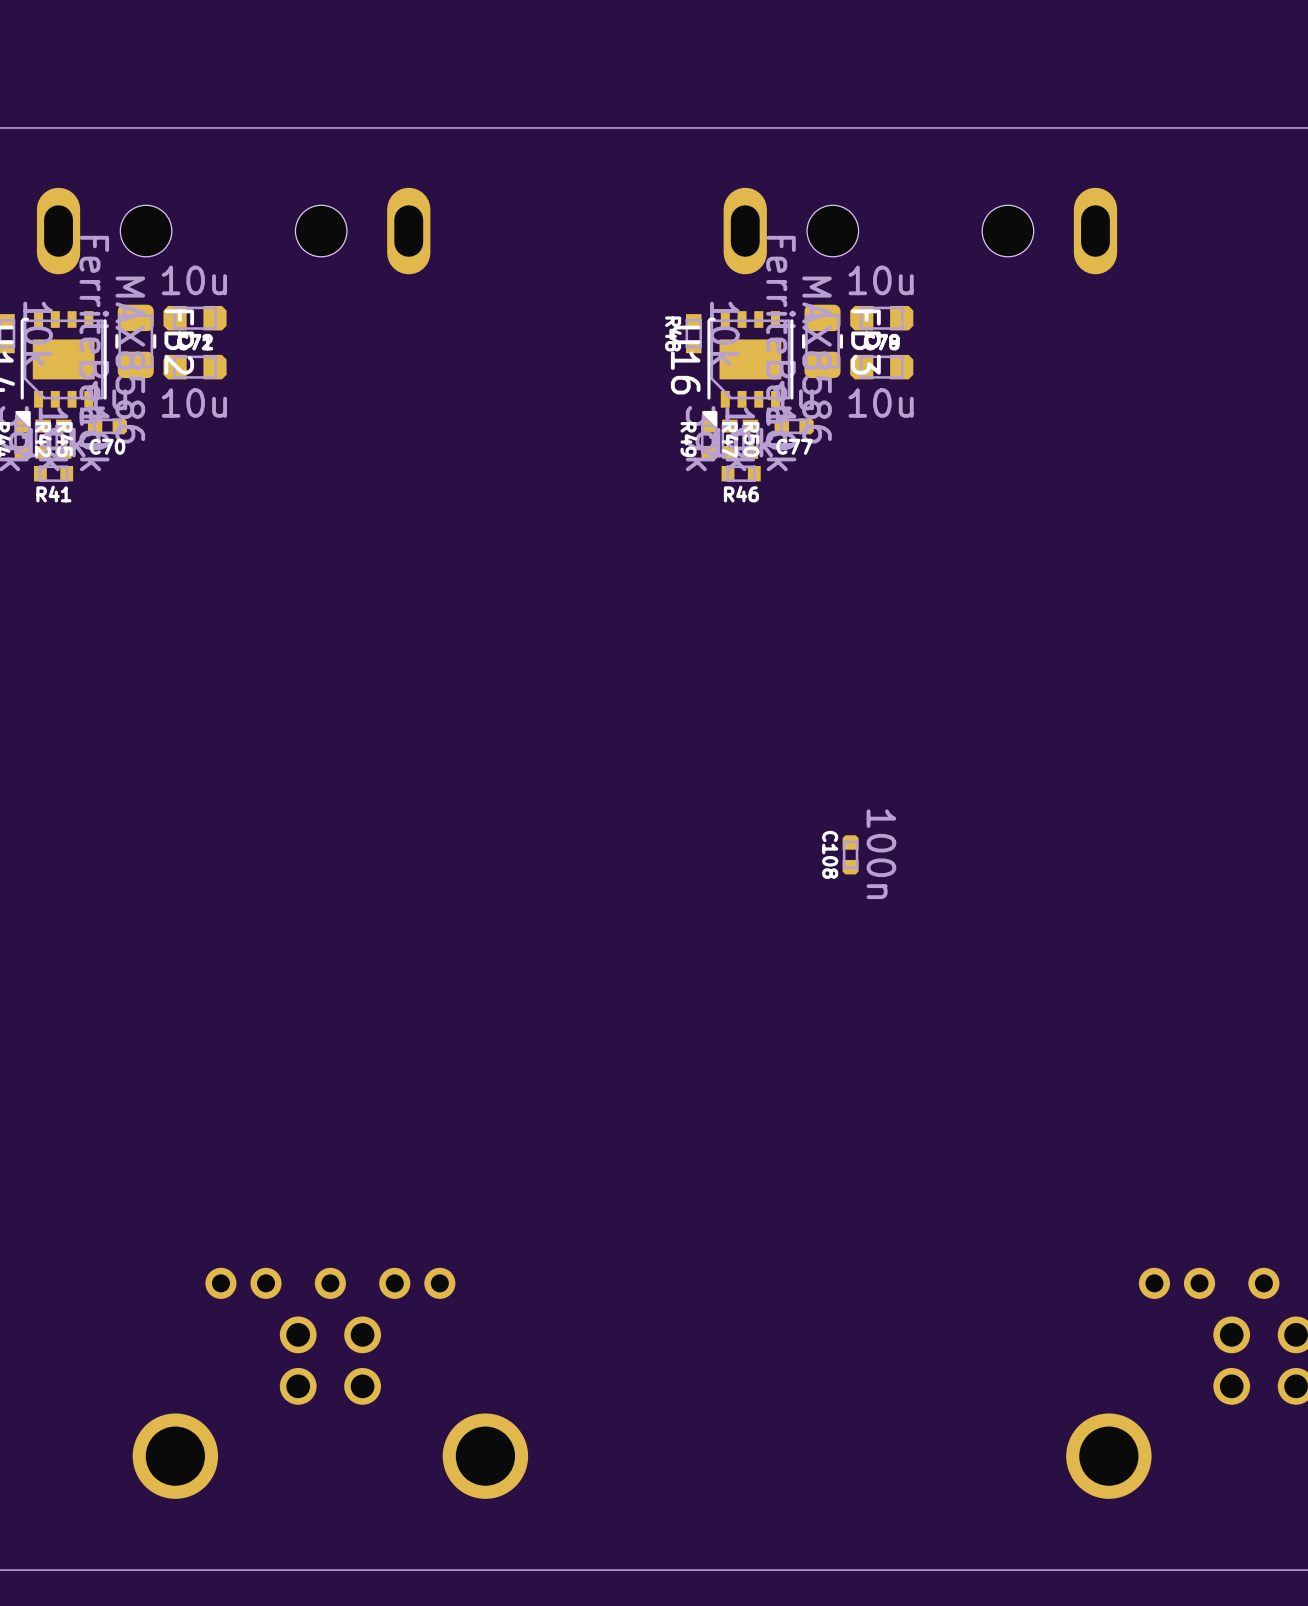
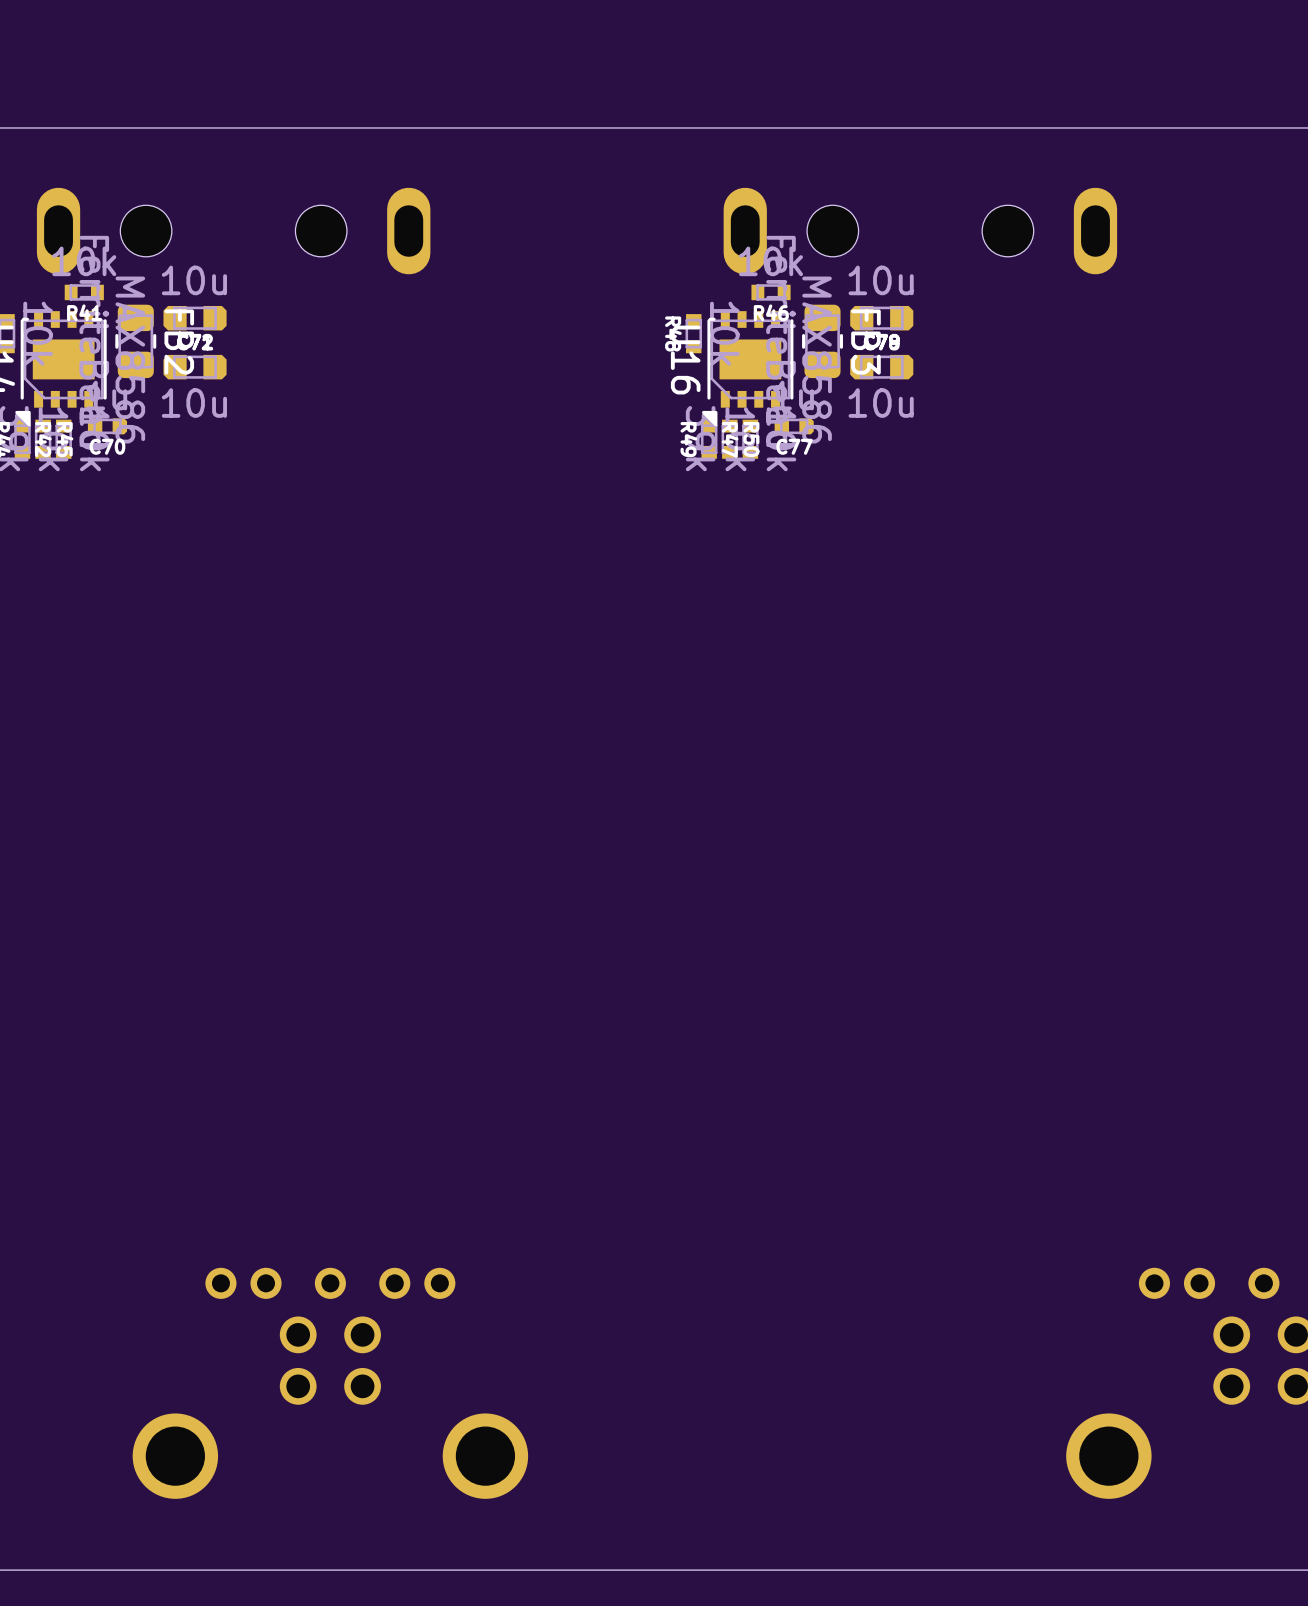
R41 position: (53, 473) -> (84, 292)
R46 position: (741, 473) -> (771, 292)
C108: 100n (850, 854) -> none

